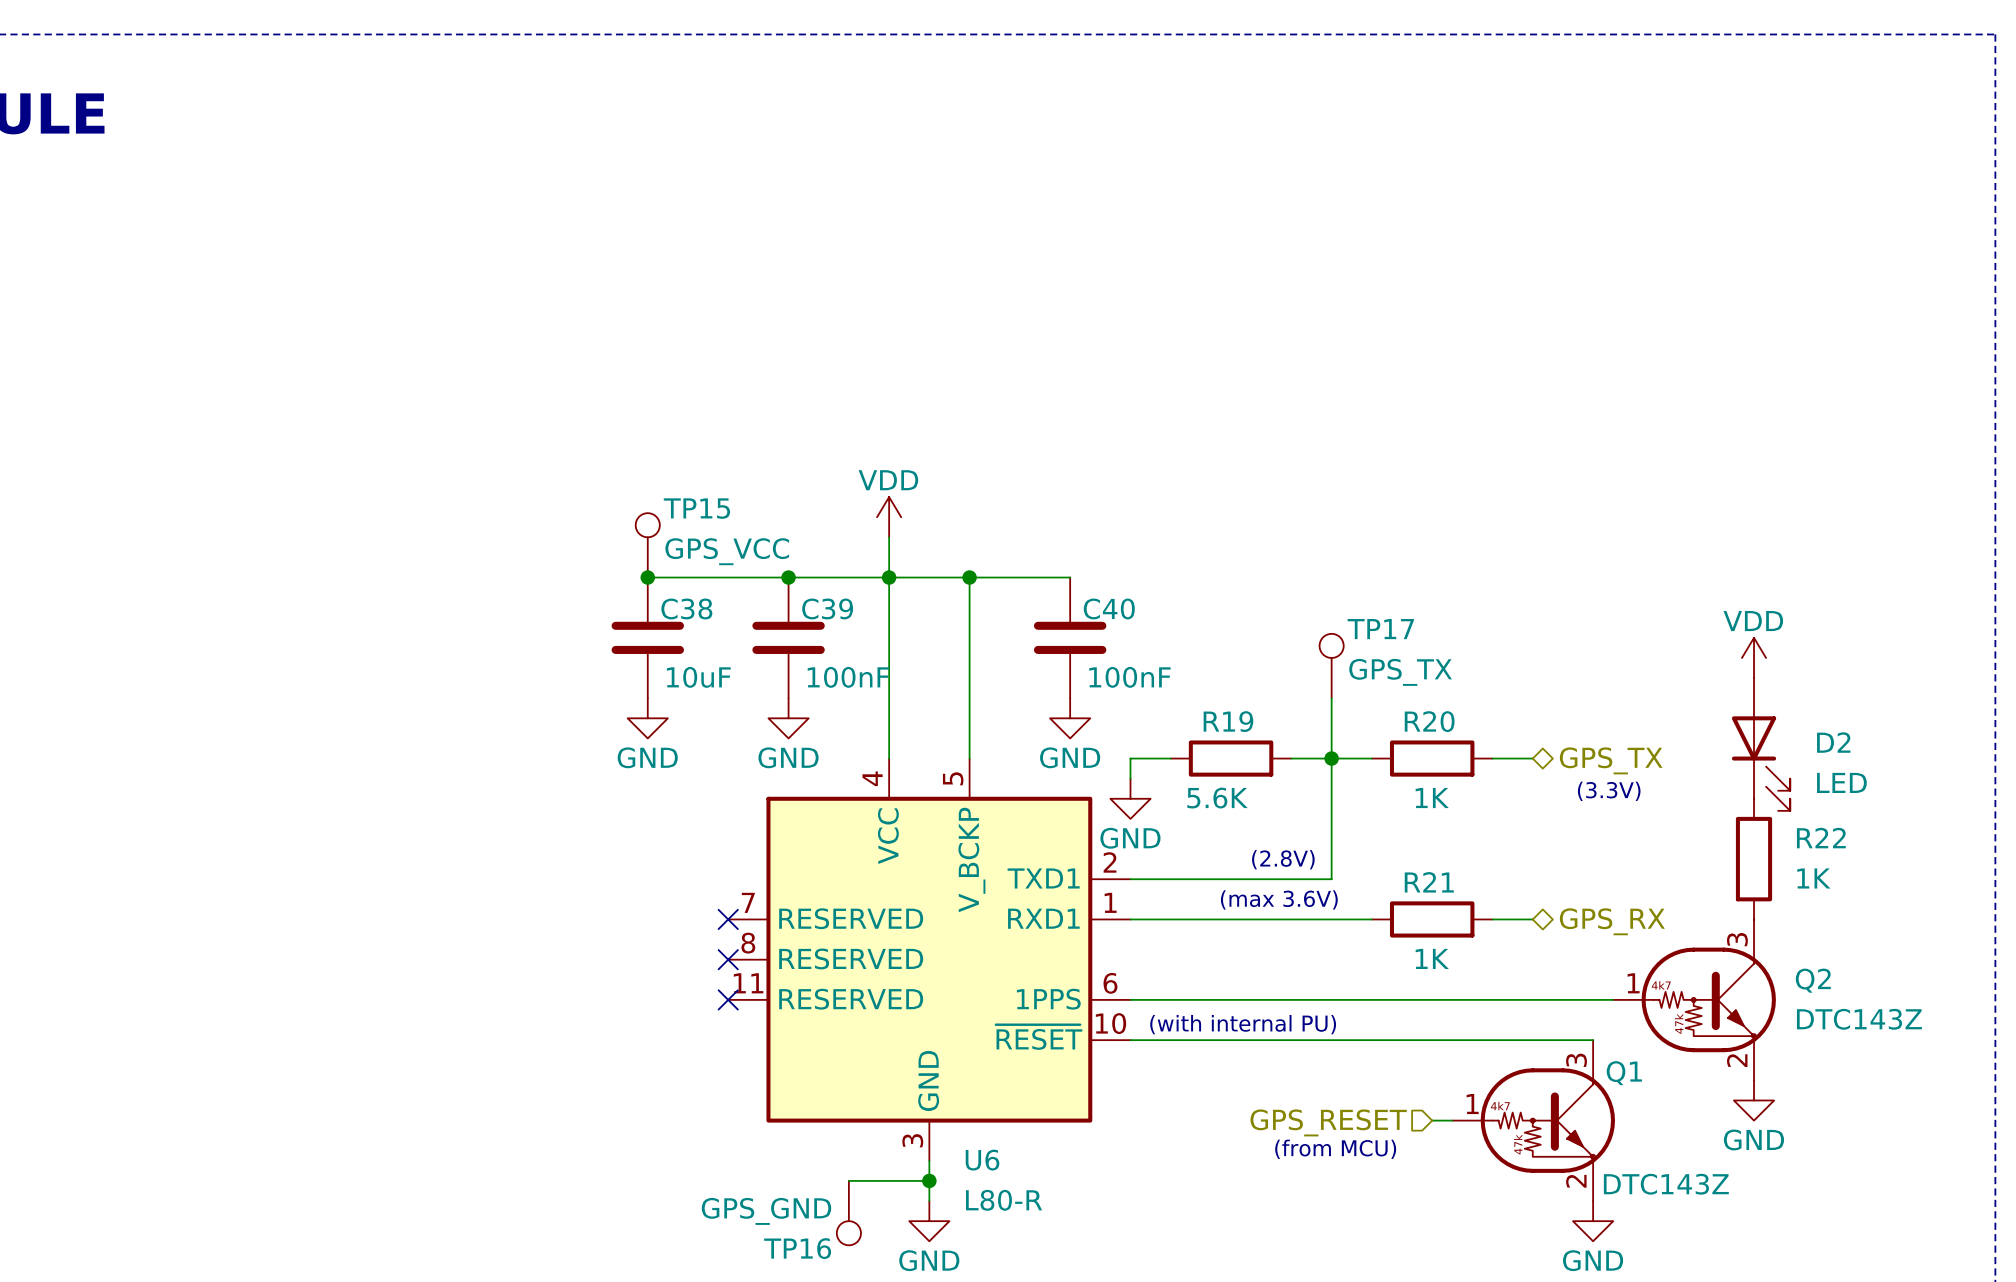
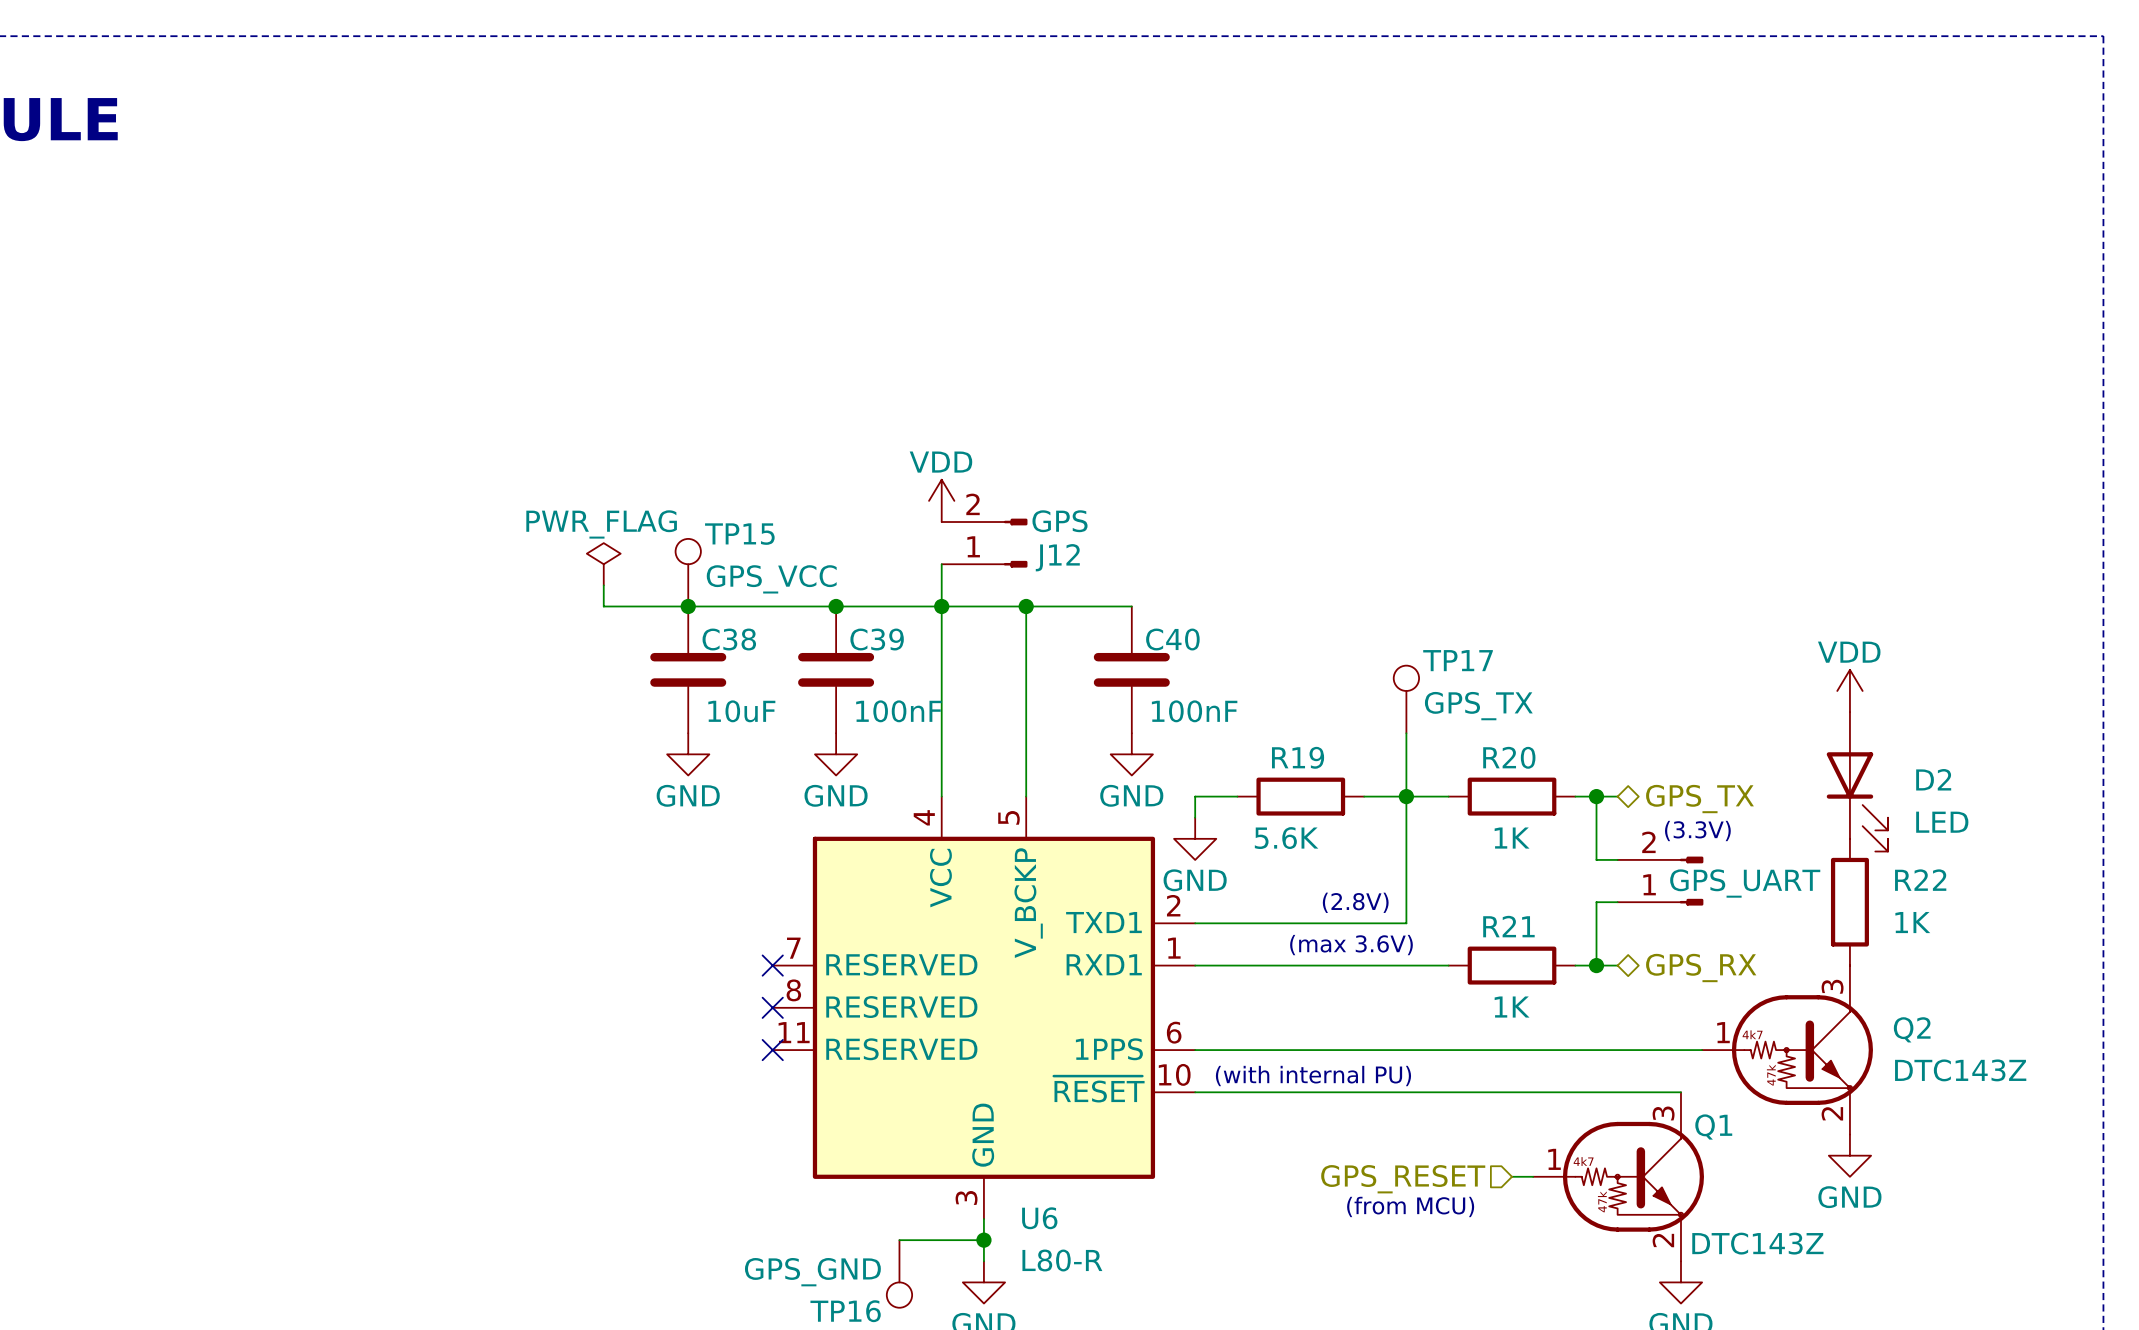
power symbol position: VDD (889, 517) -> VDD (941, 500)
J12: none -> GPS (984, 543)
power symbol: none -> PWR_FLAG (603, 564)
wire: none -> (603, 585) (603, 606) (688, 606)
wire: none -> (1596, 796) (1596, 859) (1617, 859)
junction: none -> (1596, 796)
part: none -> GPS_UART (1660, 881)
wire: none -> (1617, 902) (1596, 902) (1596, 965)
junction: none -> (1596, 965)

